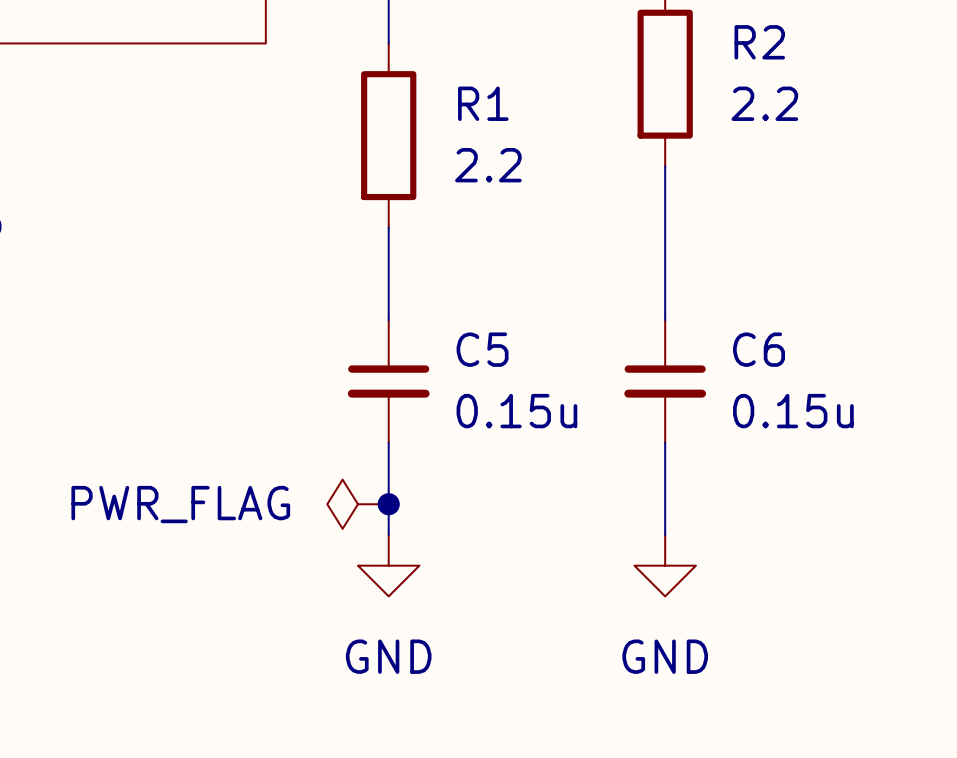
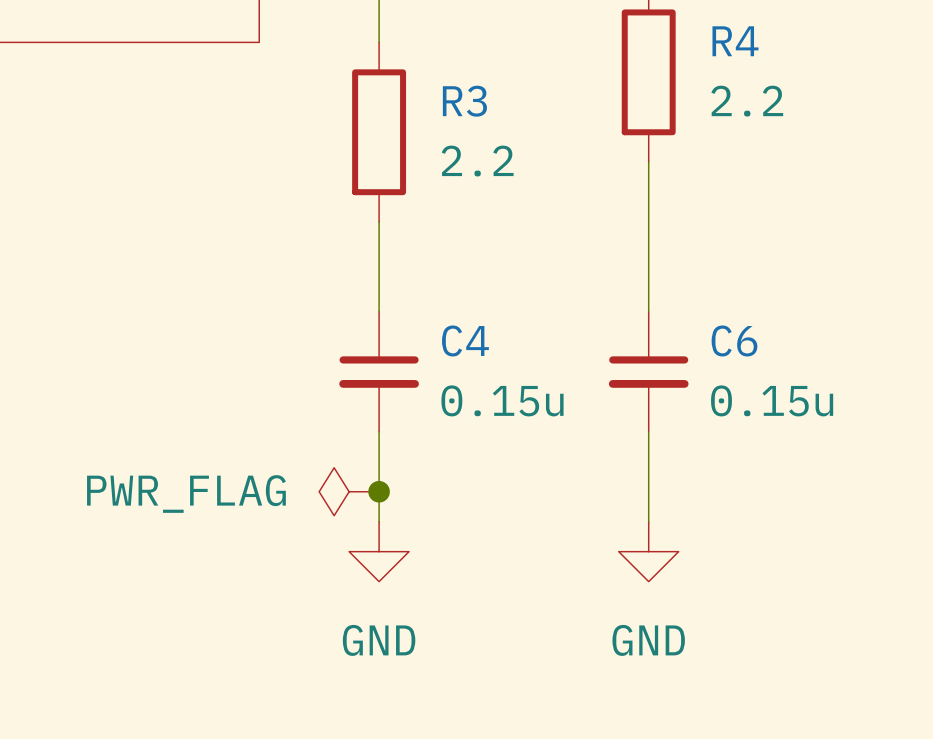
R2 name: R2 (759, 42) -> R4 (735, 41)
R1 name: R1 (483, 103) -> R3 (464, 101)
C5 name: C5 (482, 349) -> C4 (465, 340)

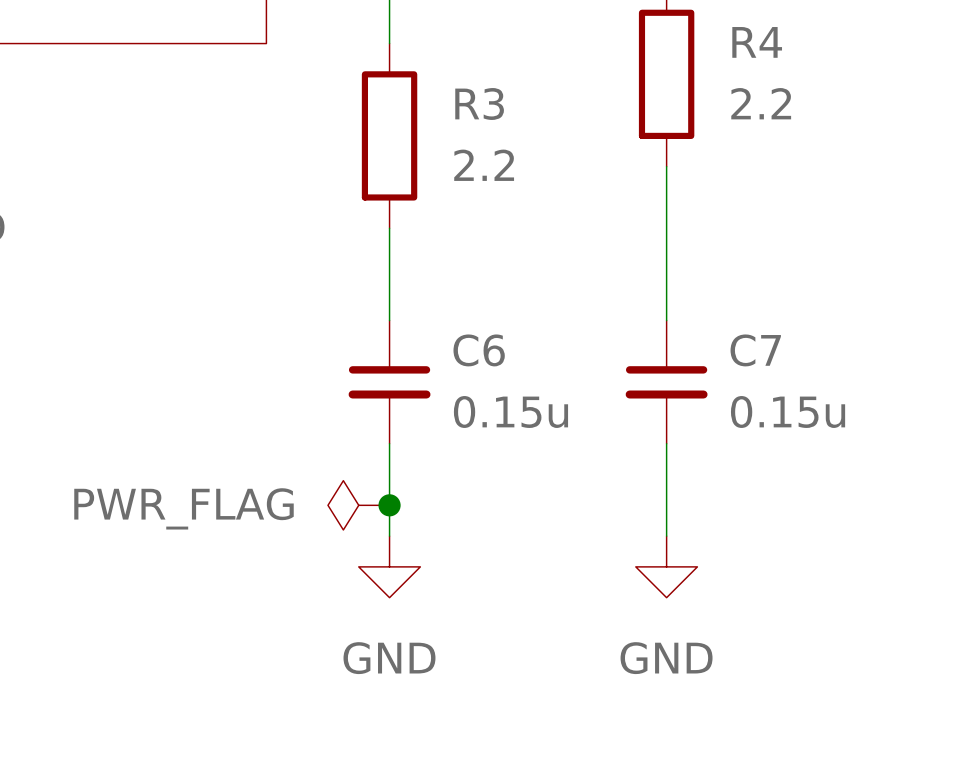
C4 name: C4 (465, 340) -> C6 (479, 350)
C6 name: C6 (734, 340) -> C7 (755, 350)

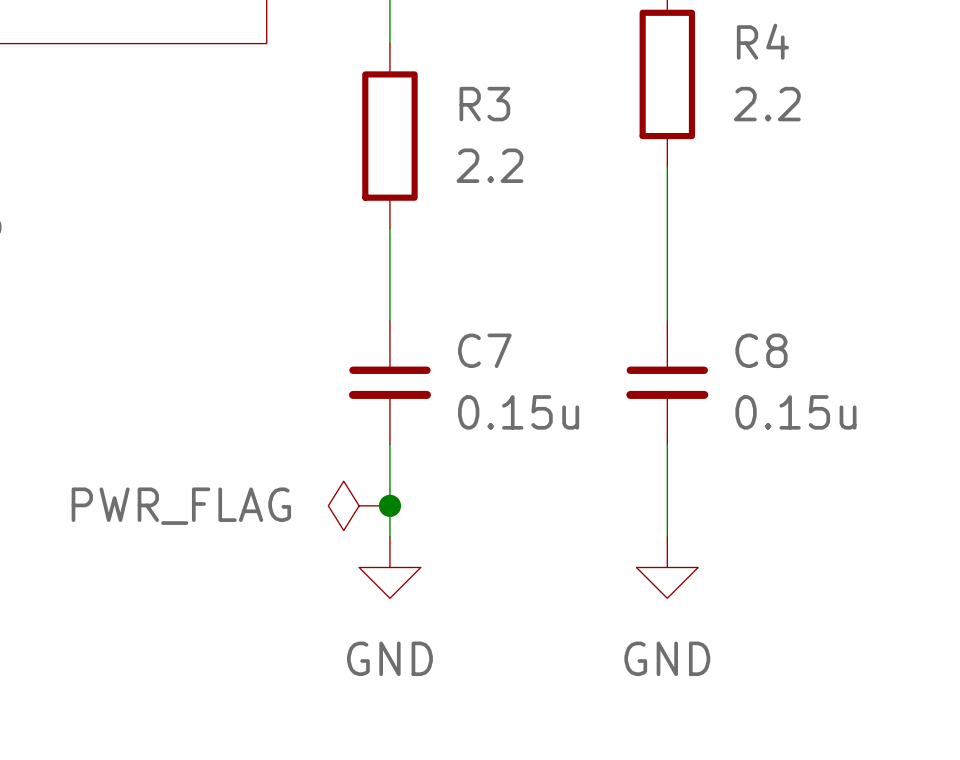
C6 name: C6 (479, 350) -> C7 (484, 350)
C7 name: C7 (755, 350) -> C8 (761, 350)

